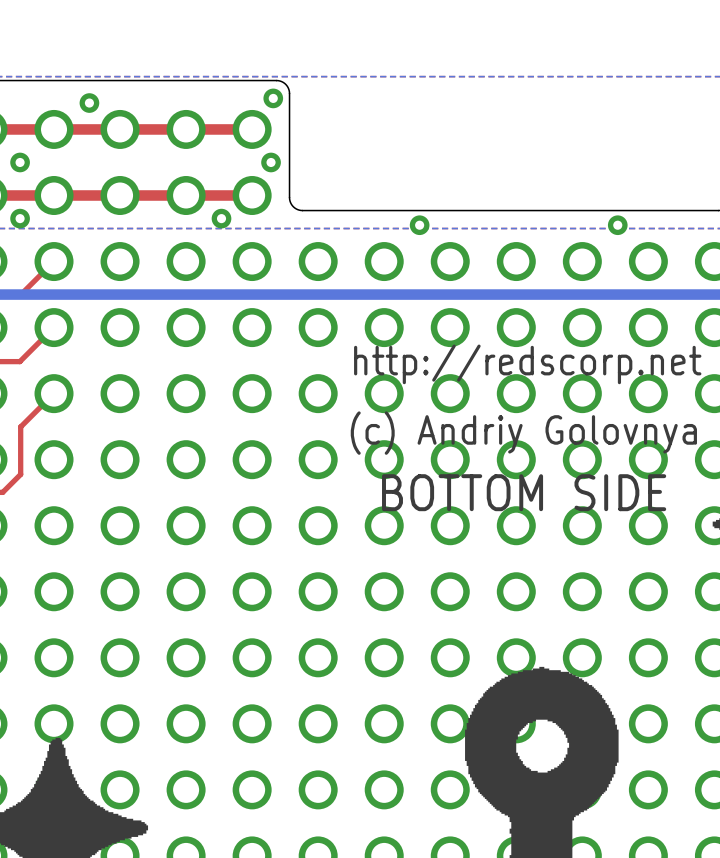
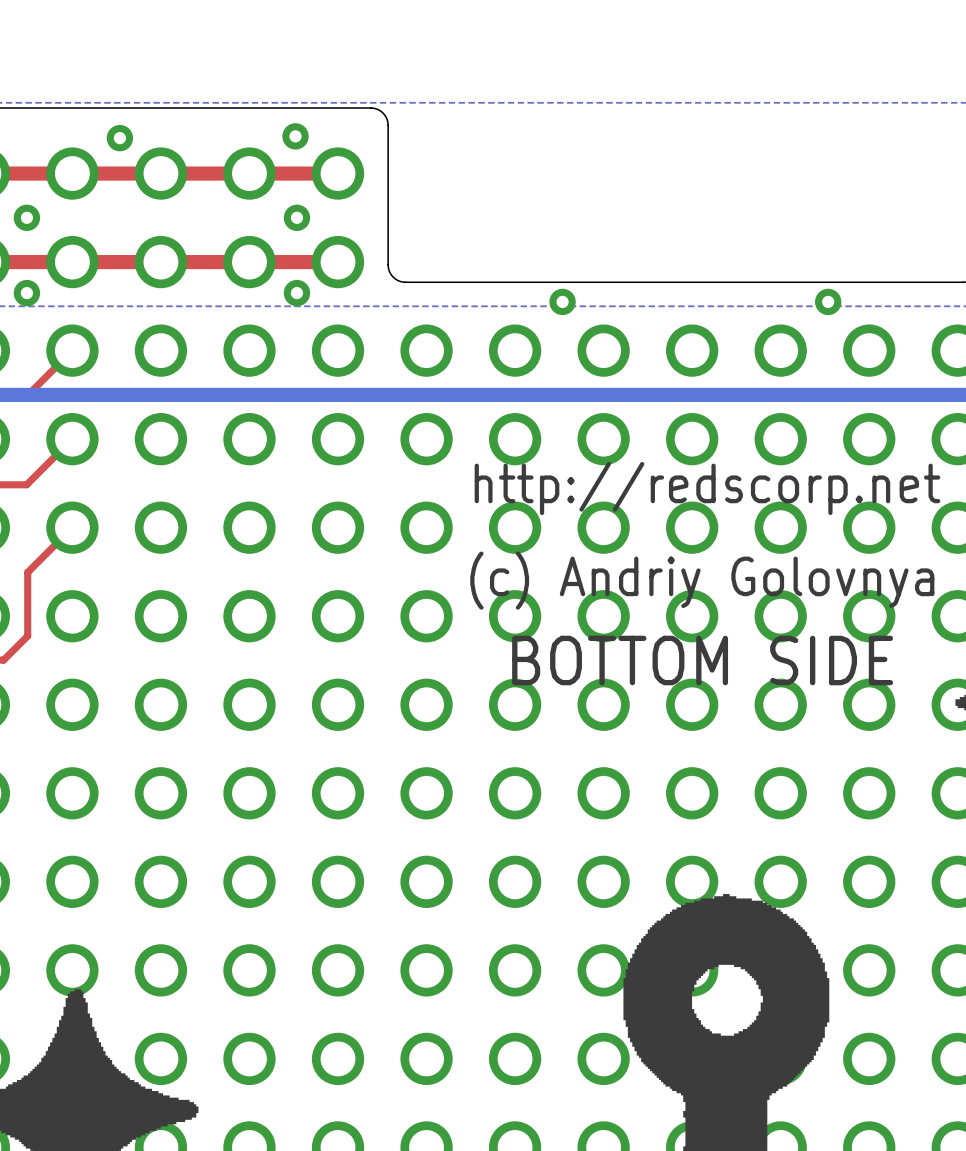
via: (273, 98) -> none
via: none -> (295, 136)
via: none -> (296, 217)
via: (271, 162) -> none

